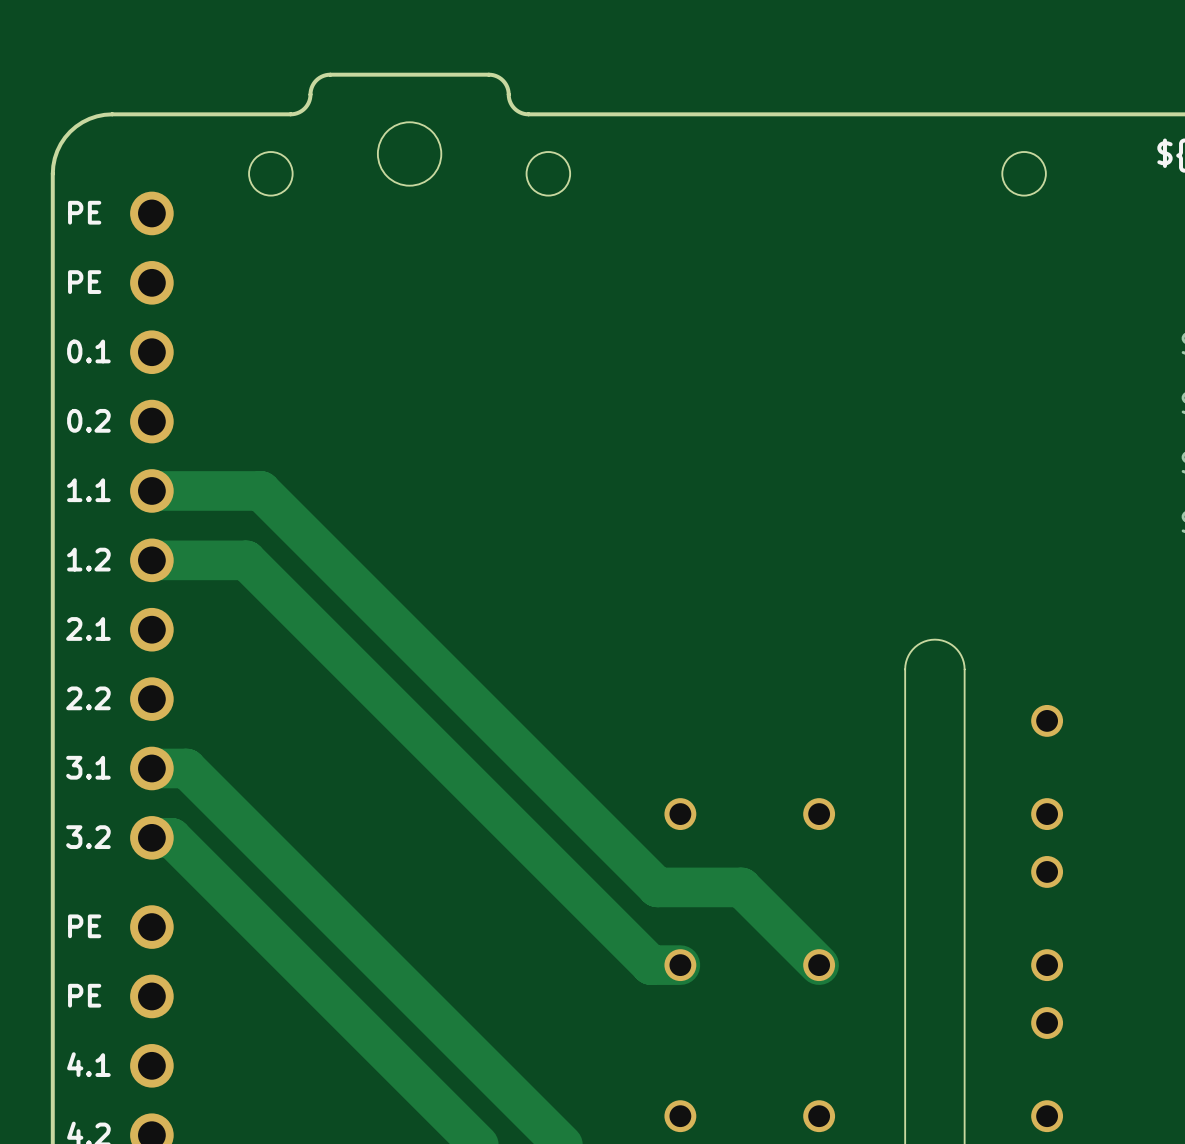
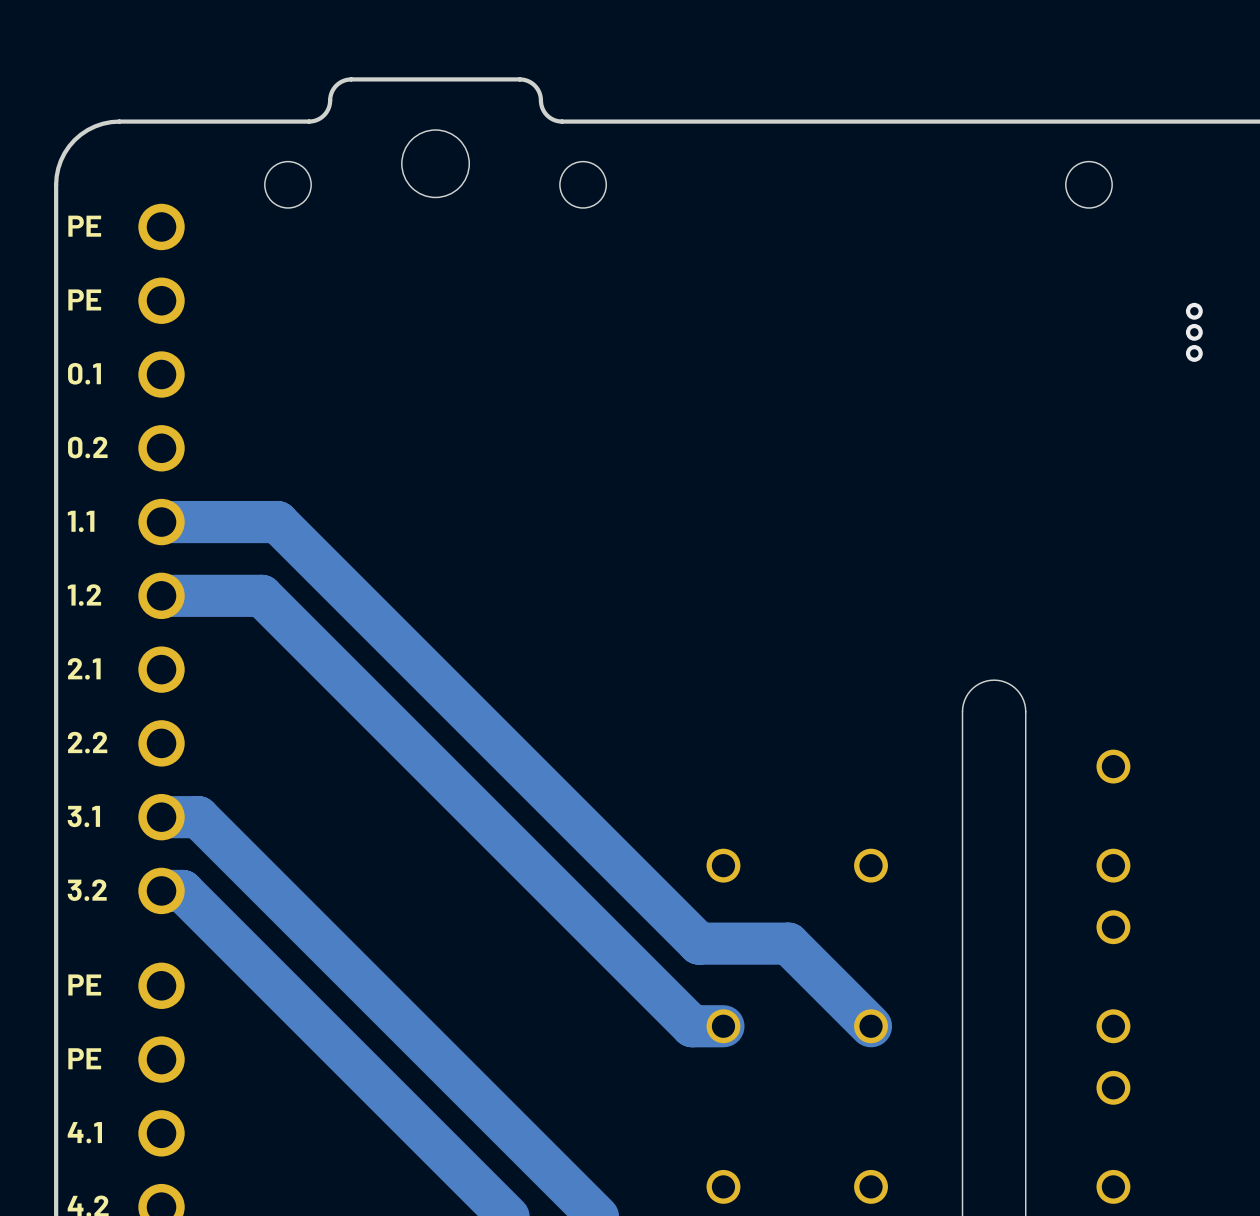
via: none -> (1194, 311)
via: none -> (1194, 332)
via: none -> (1194, 353)

